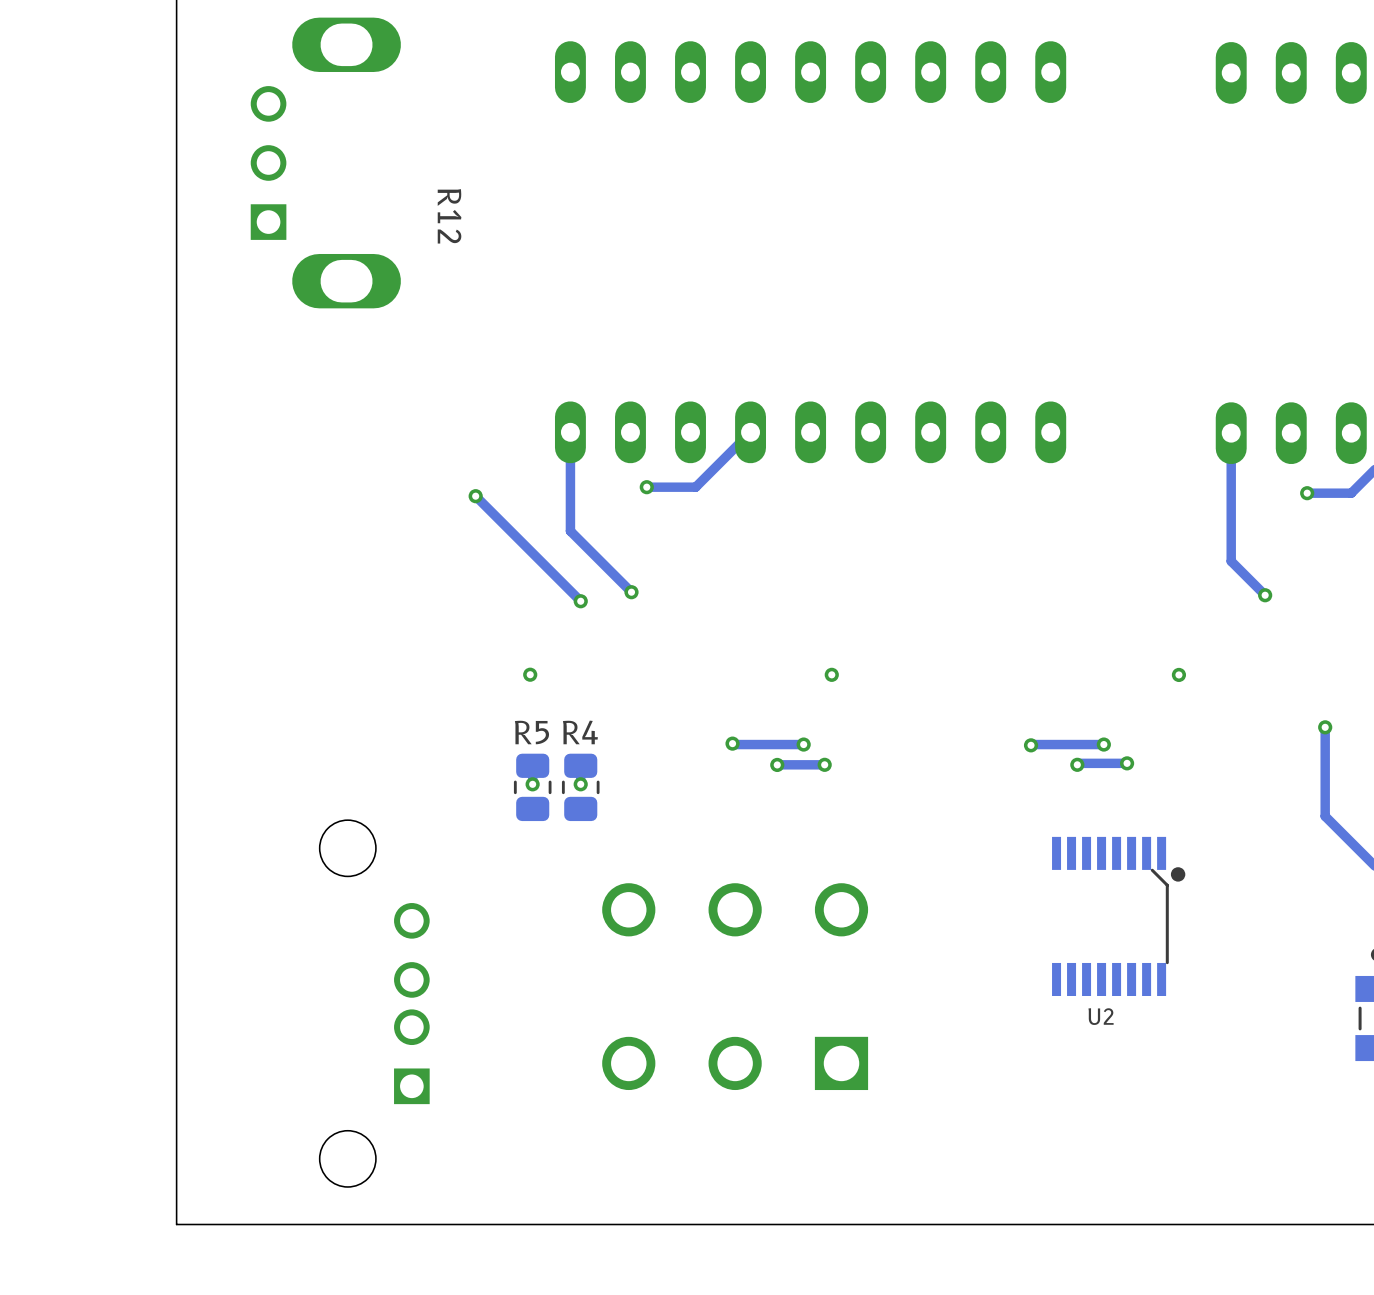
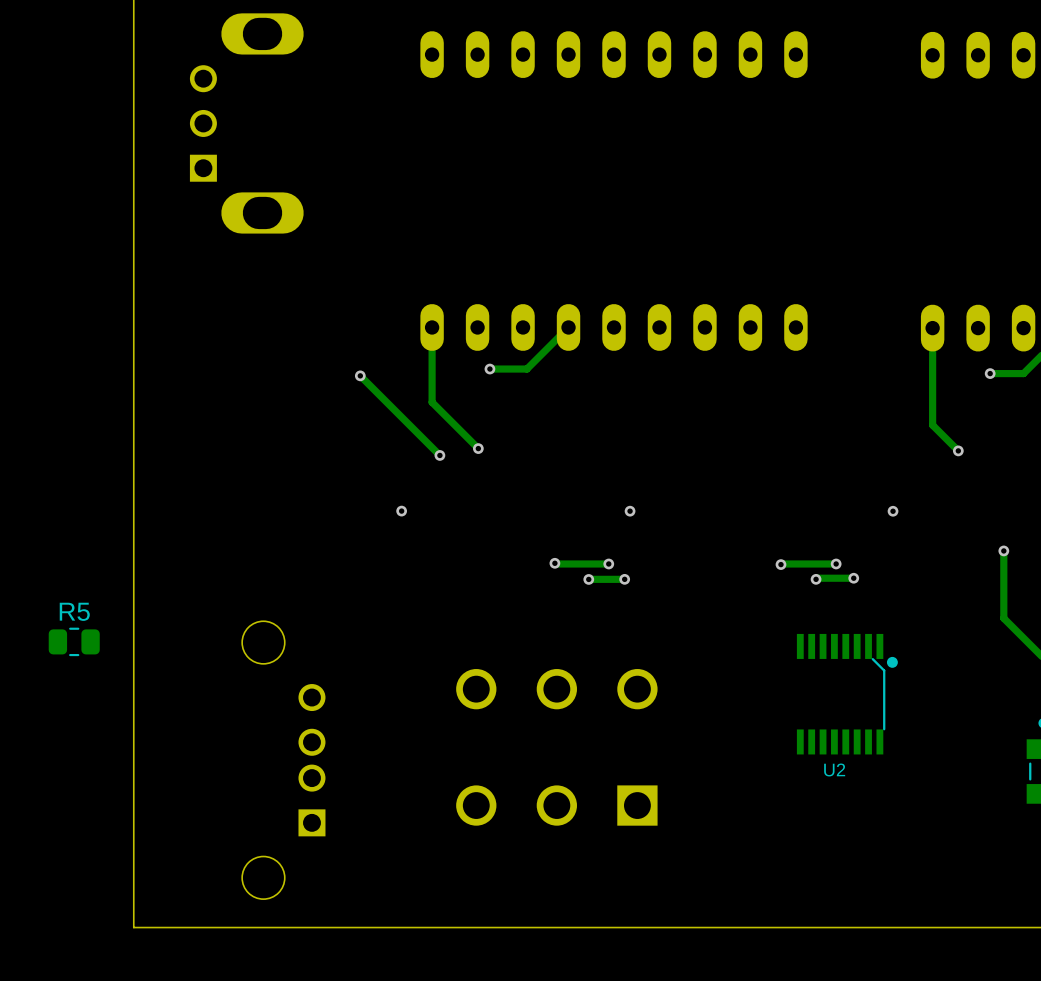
R12 name: R12 (449, 216) -> none
via: (532, 784) -> none
via: (580, 784) -> none
R5 rotation: 0° (532, 787) -> 90° clockwise (74, 641)
R5 position: (532, 787) -> (74, 641)
R4: (580, 787) -> none

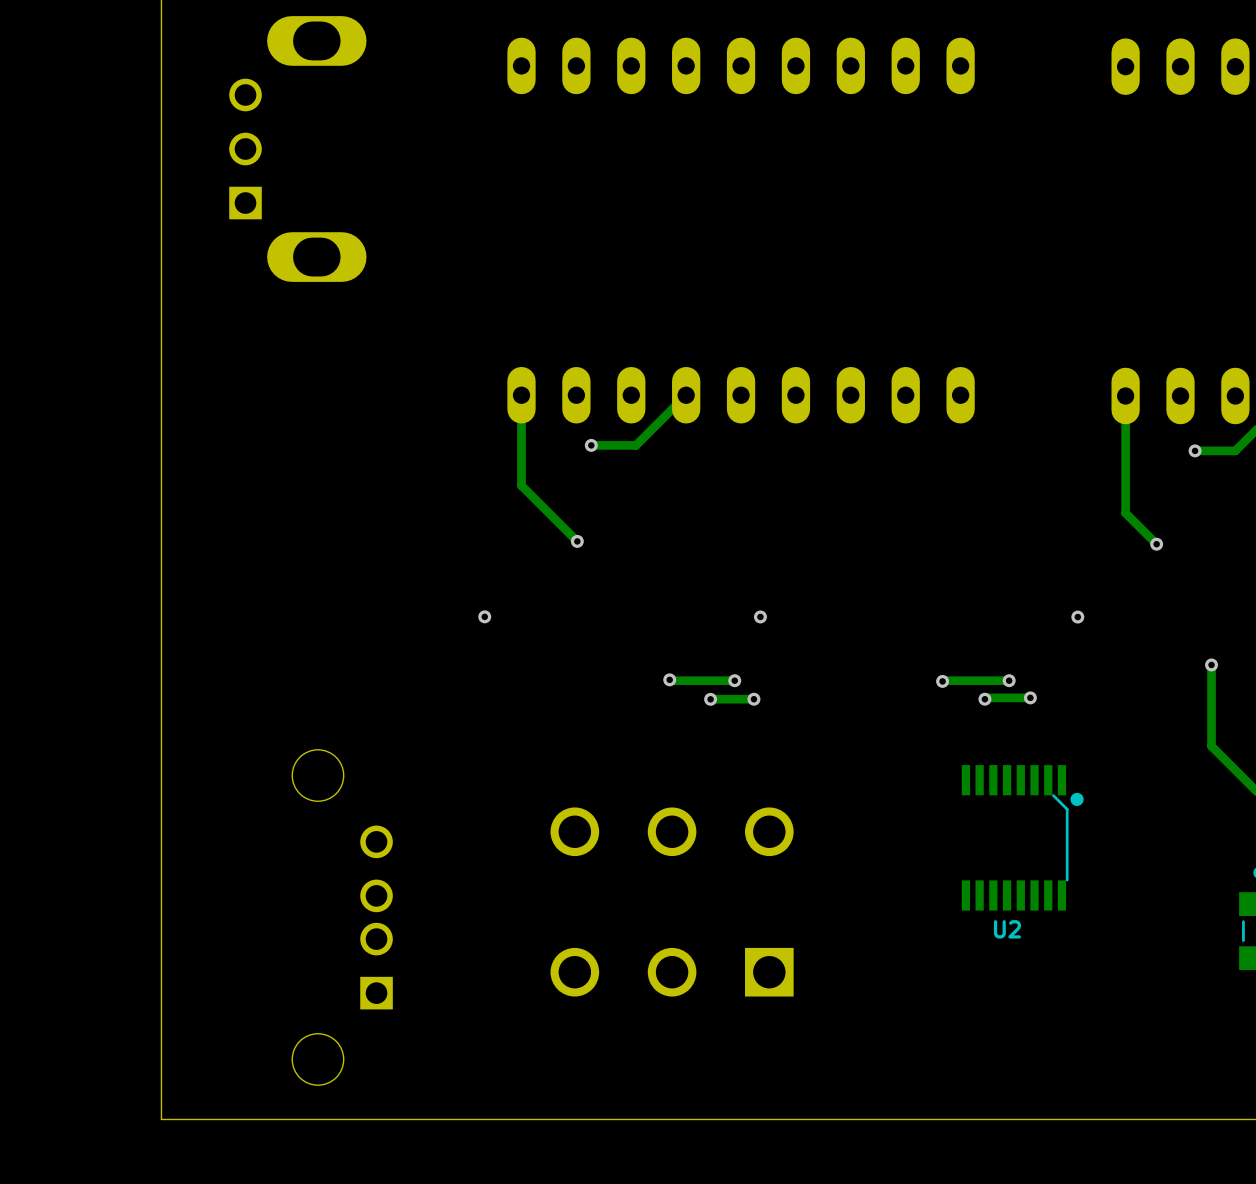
track: (360, 375) (439, 455) -> none
via: (360, 375) -> none
via: (439, 455) -> none
R5: (74, 641) -> none

